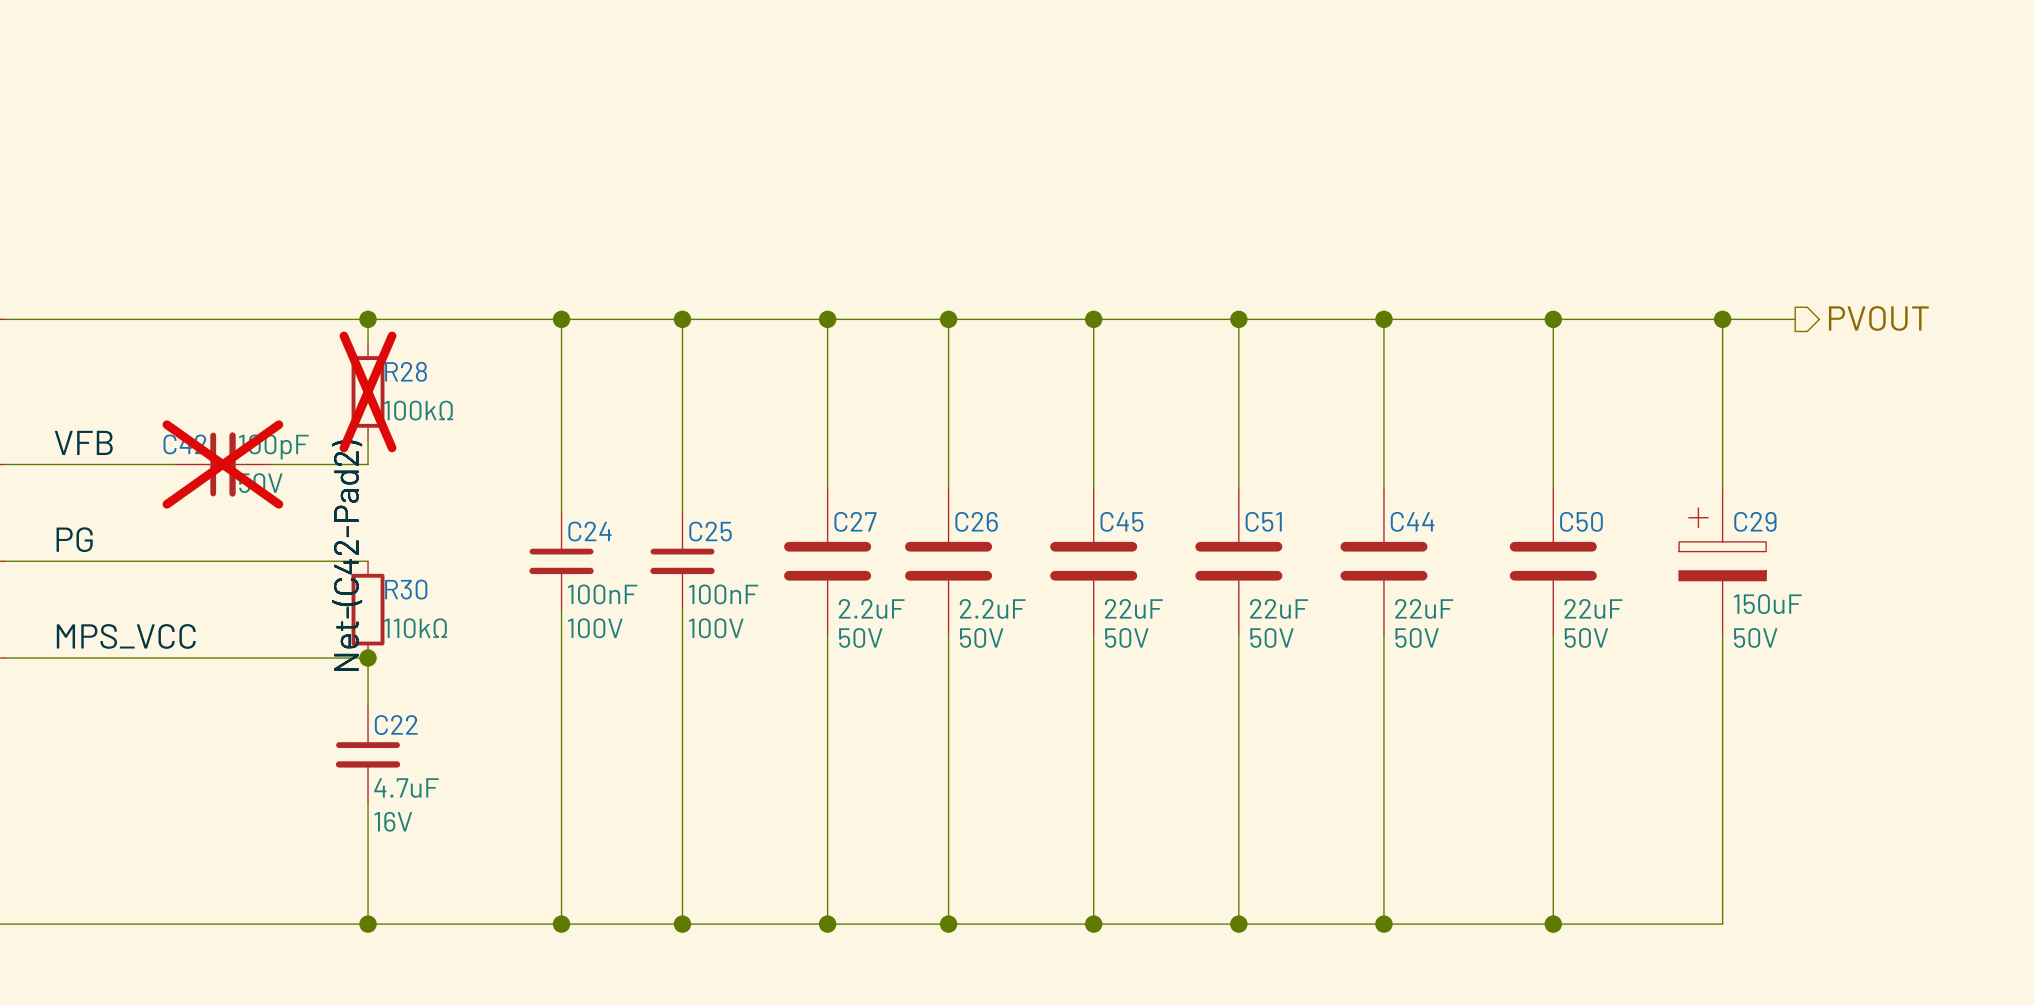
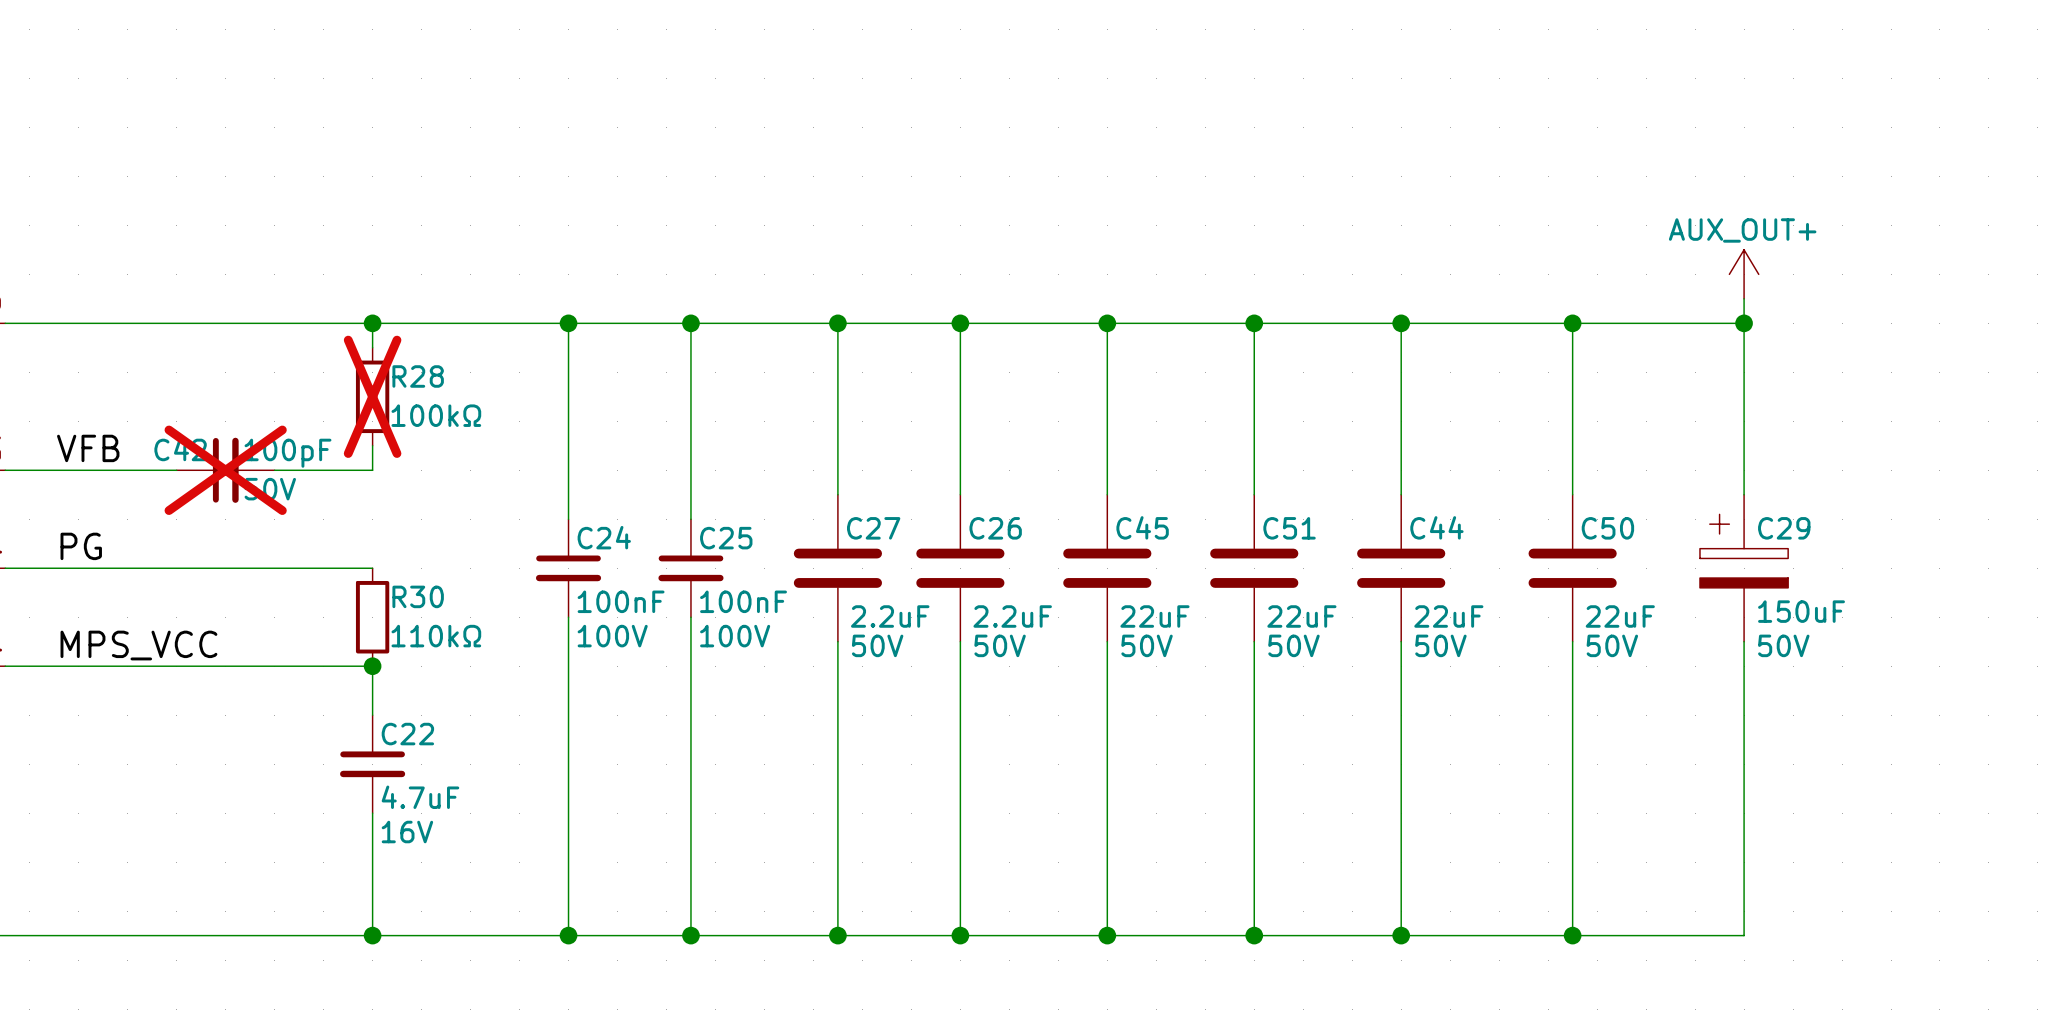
power symbol: none -> AUX_OUT+ (1744, 274)
hierarchical label: PVOUT (1878, 318) -> none
wire: (1722, 319) (1795, 319) -> (1744, 323) (1744, 298)
label: Net-(C42-Pad2) (347, 555) -> none

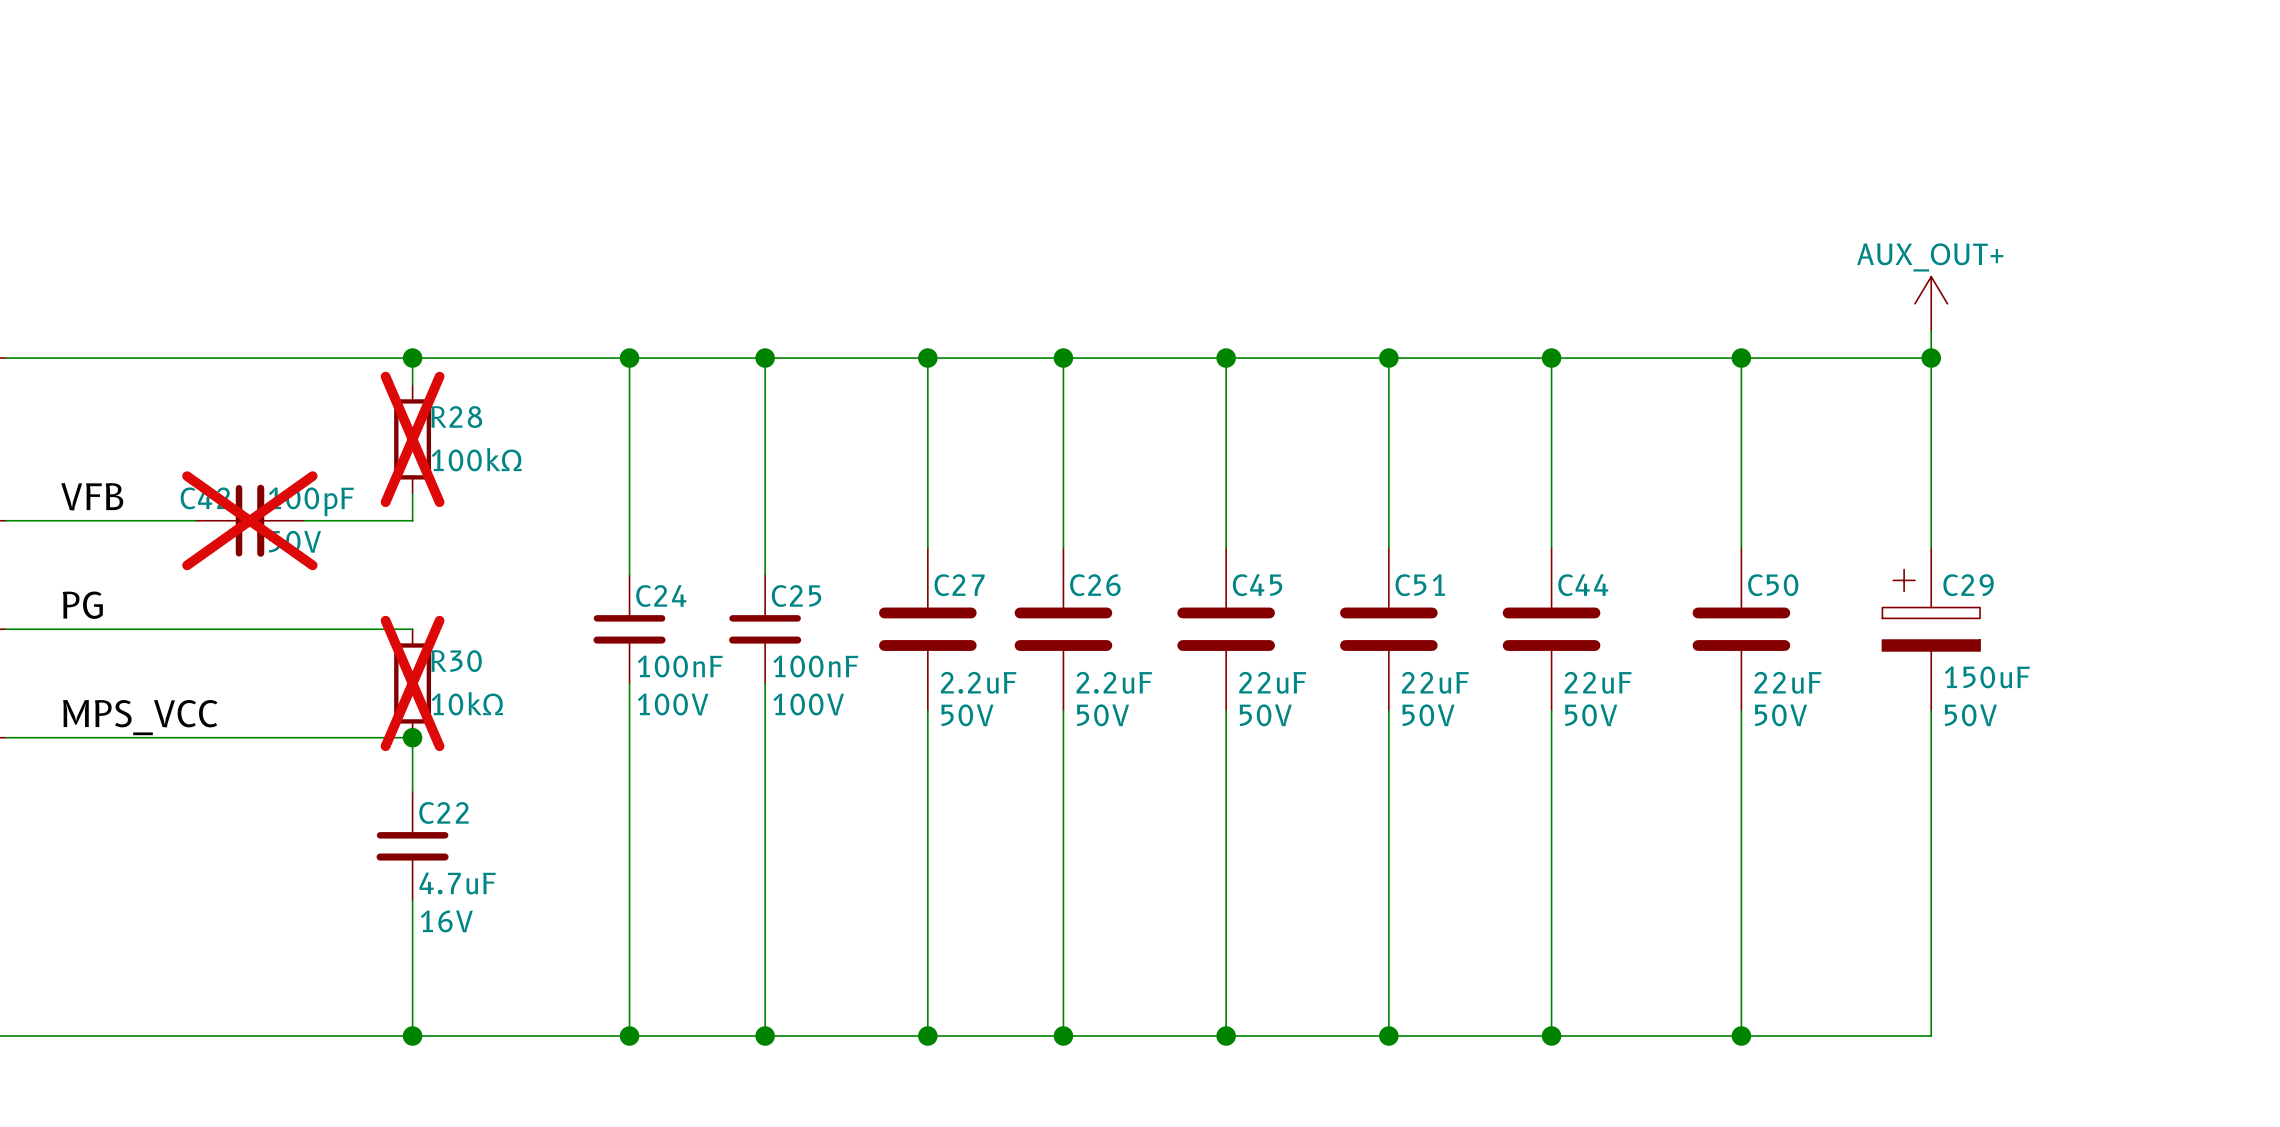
R30 do-not-place cross: none -> (412, 683)
R30 value: 110kΩ (436, 636) -> 10kΩ (467, 703)

